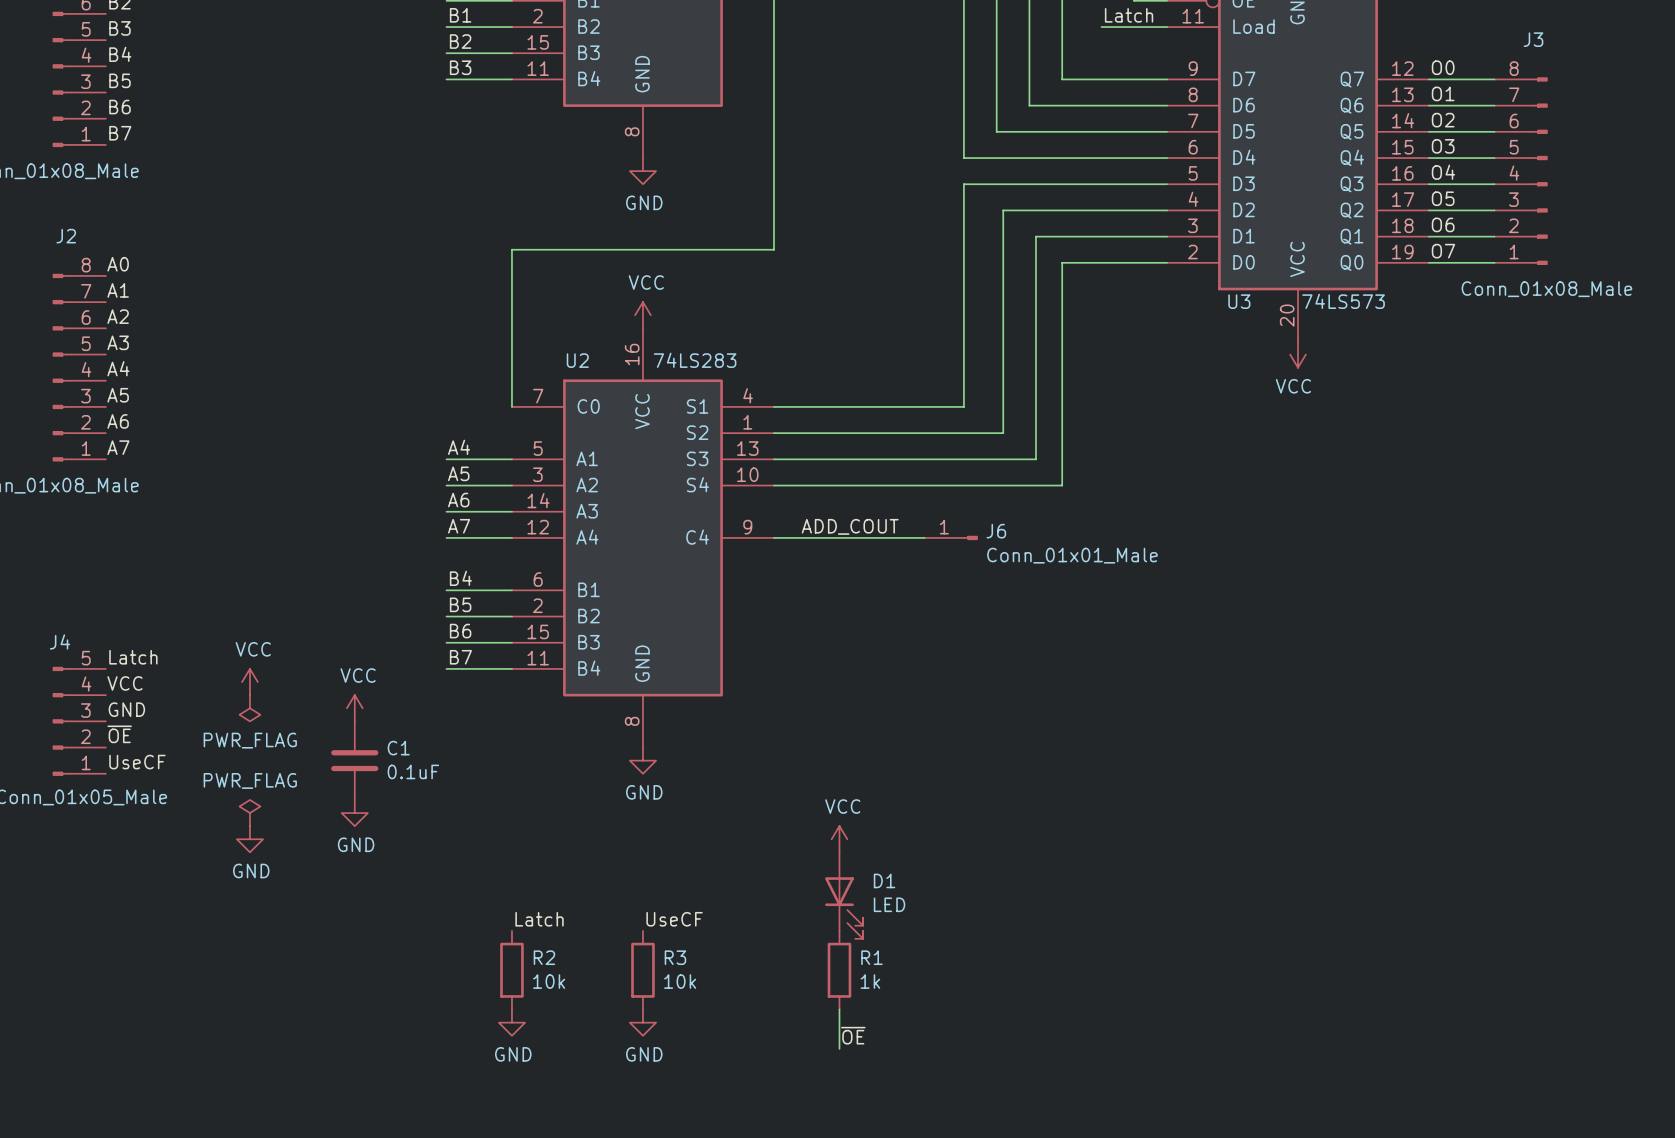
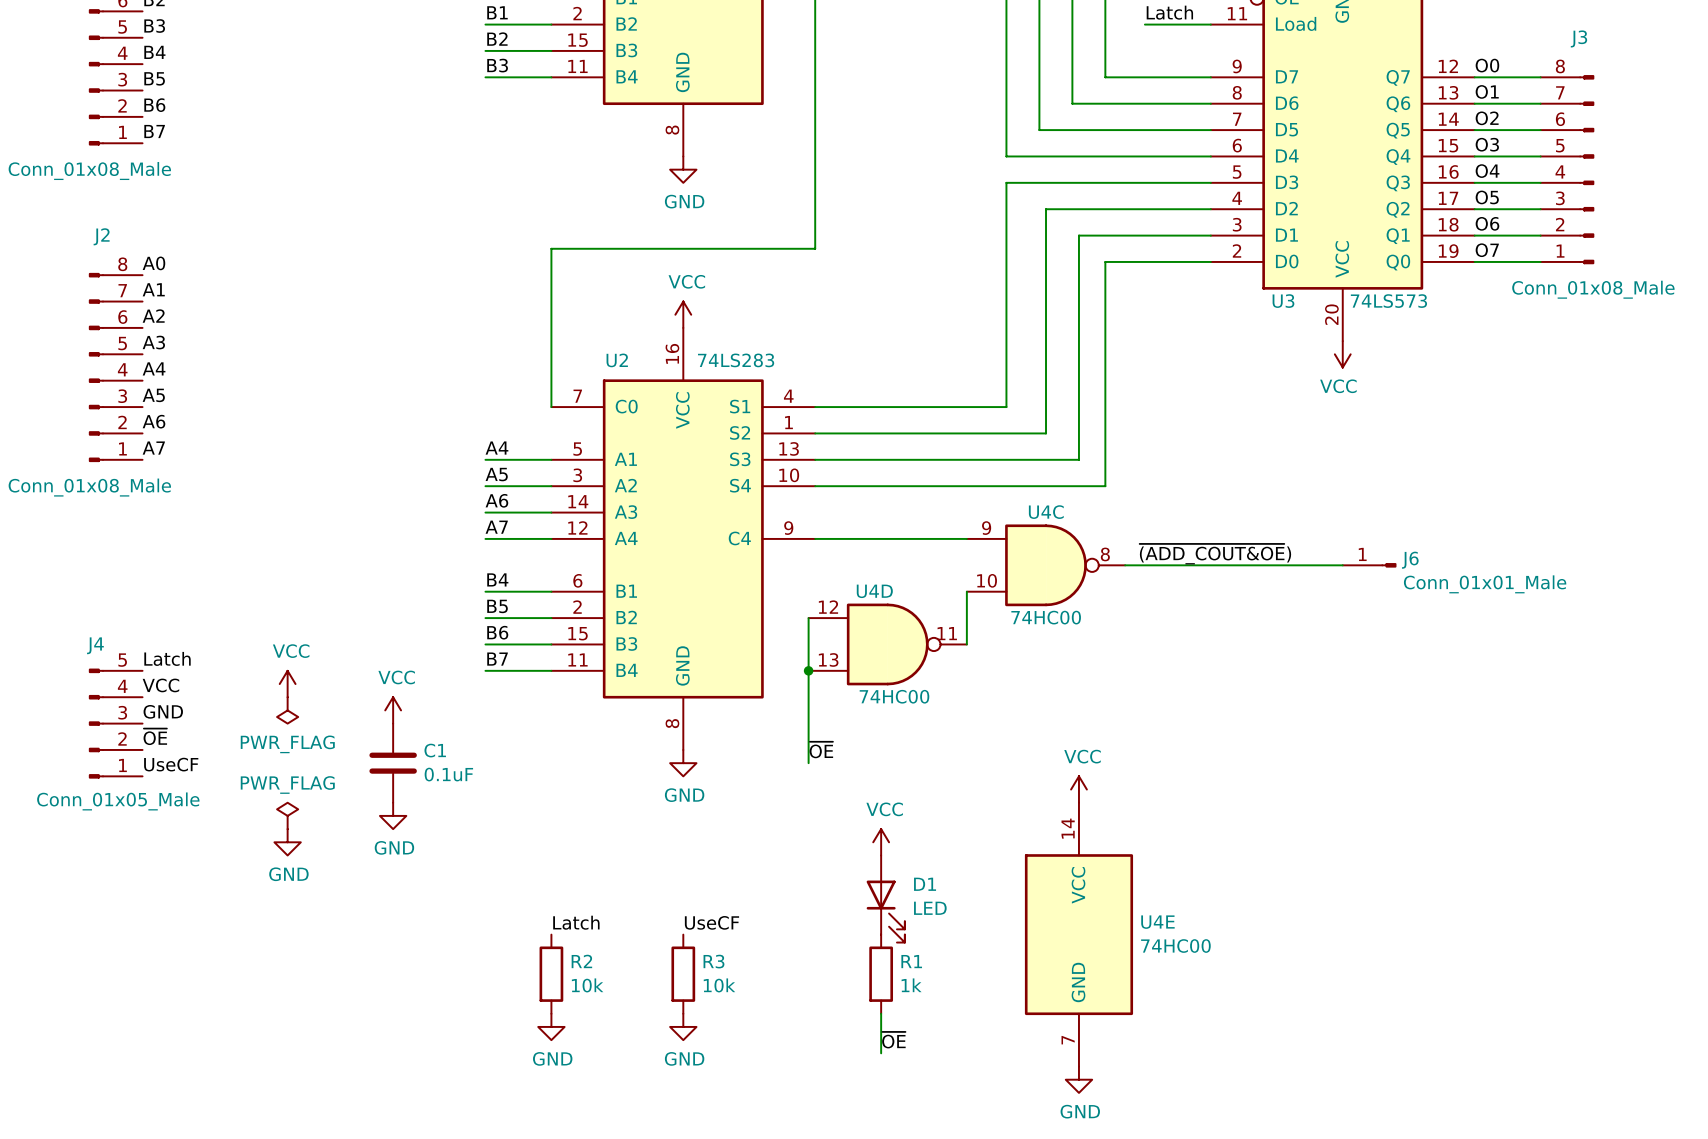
label: ADD_COUT (850, 526) -> none
J6 position: (951, 537) -> (1369, 565)
label: none -> ~{(ADD_COUT&OE}) (1215, 554)
U4C: none -> 74HC00 (1046, 565)
wire: none -> (1125, 565) (1342, 565)
wire: none -> (966, 591) (966, 644)
wire: none -> (808, 618) (808, 763)
U4D: none -> 74HC00 (887, 644)
junction: none -> (808, 670)
label: none -> ~{OE} (821, 750)
power symbol: none -> VCC (1078, 789)
U4E: none -> 74HC00 (1078, 934)
power symbol: none -> GND (1078, 1079)

